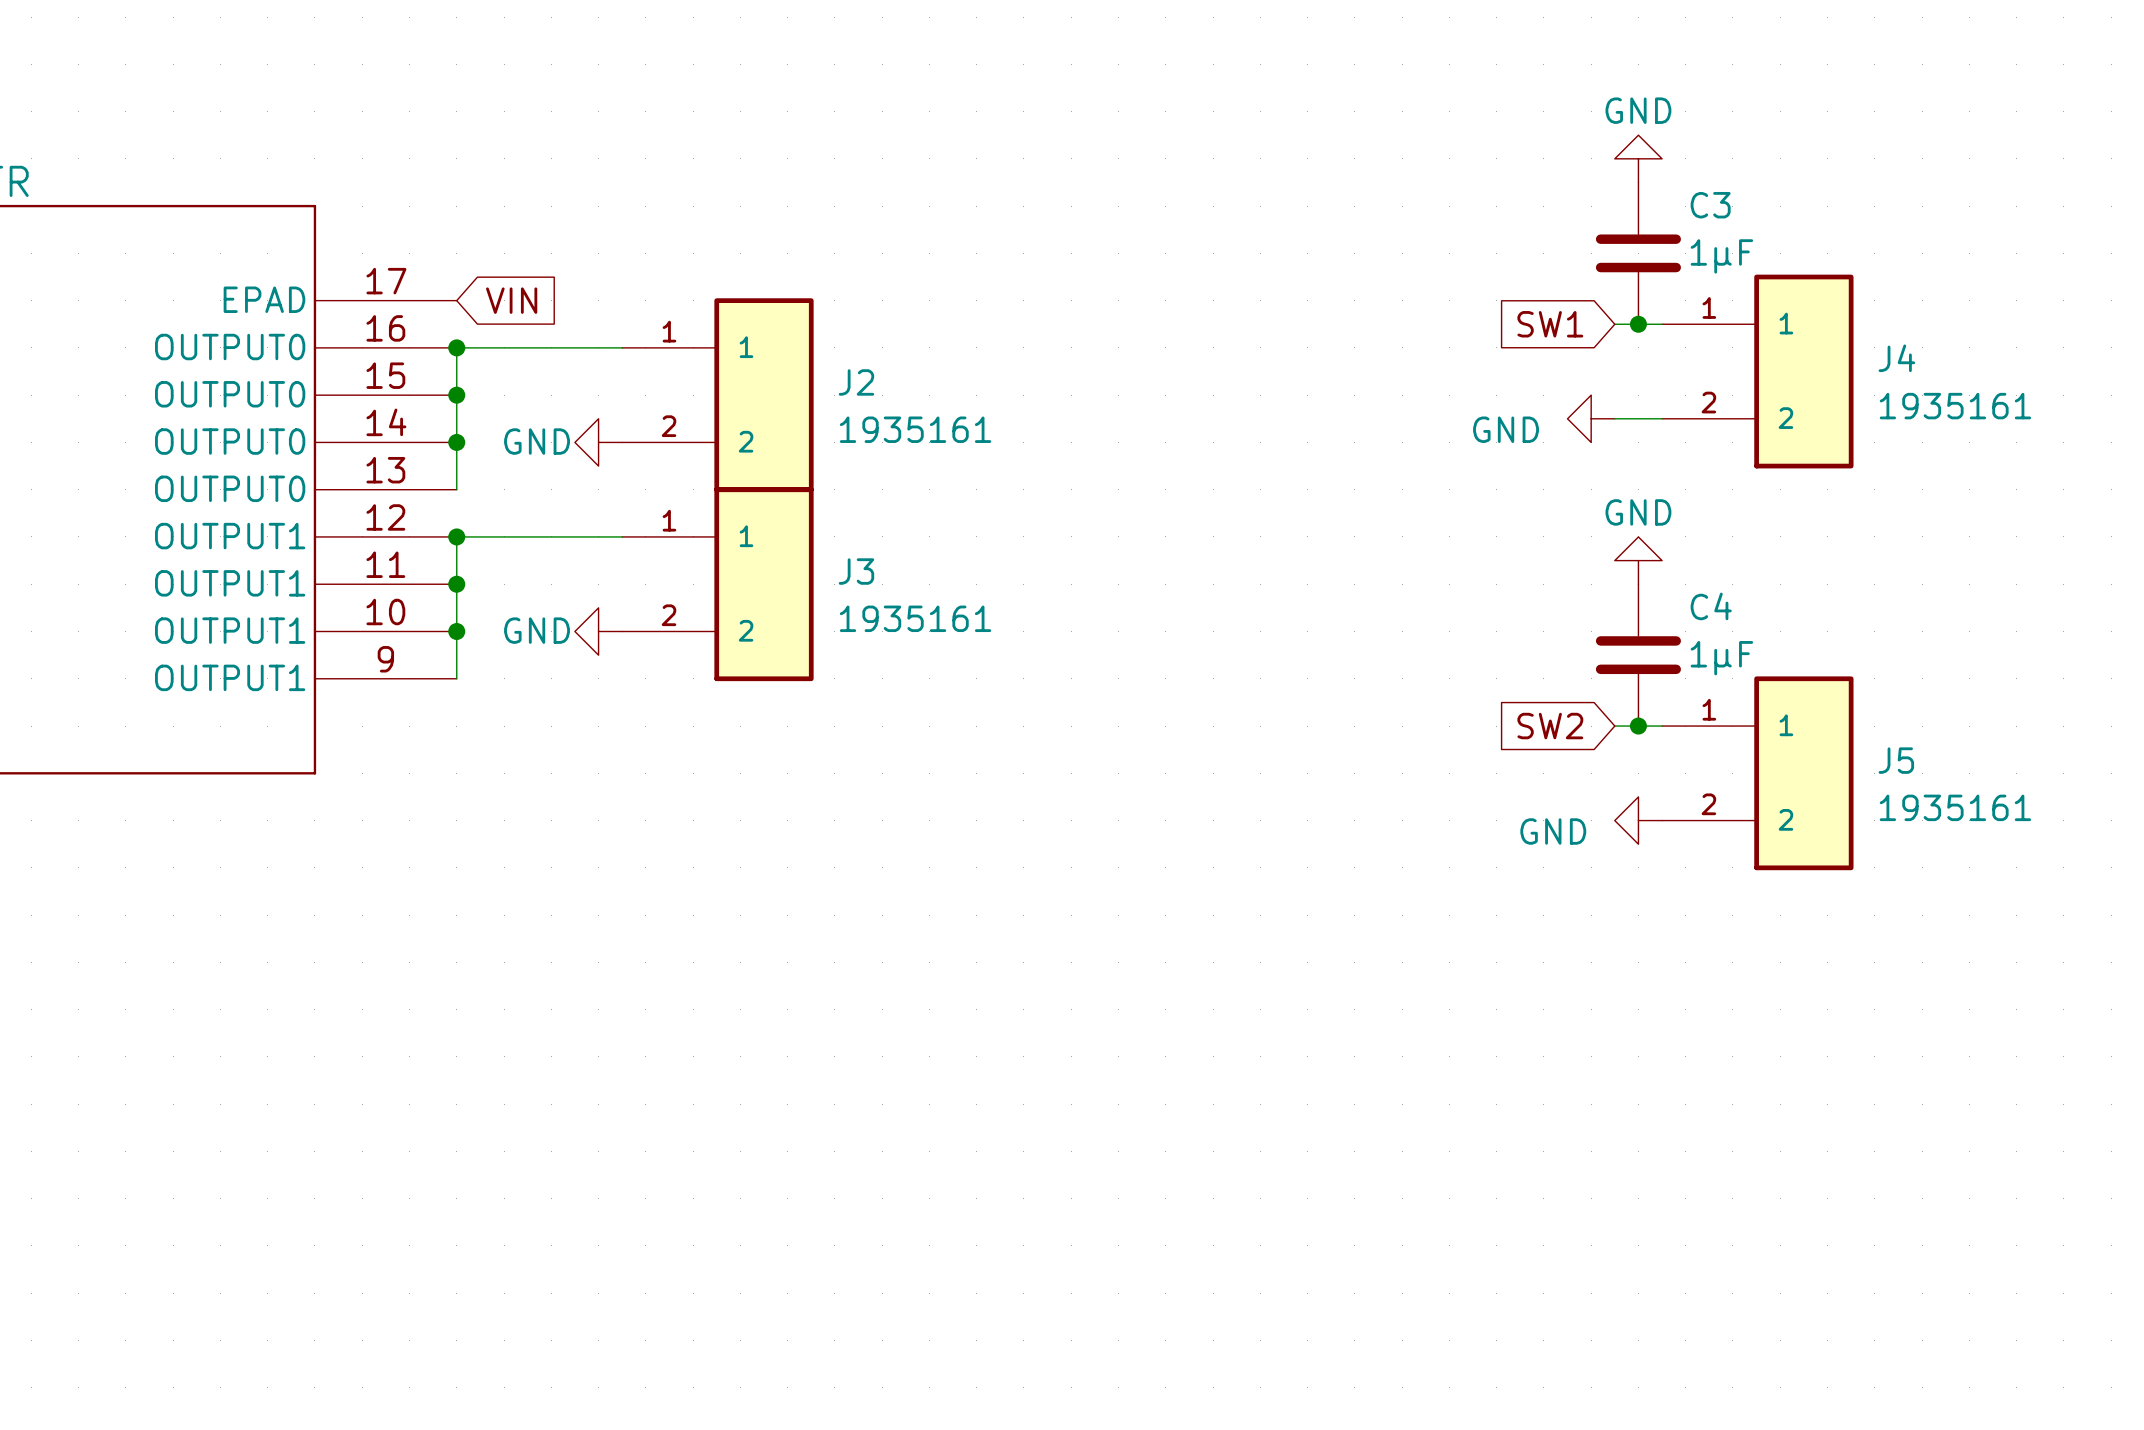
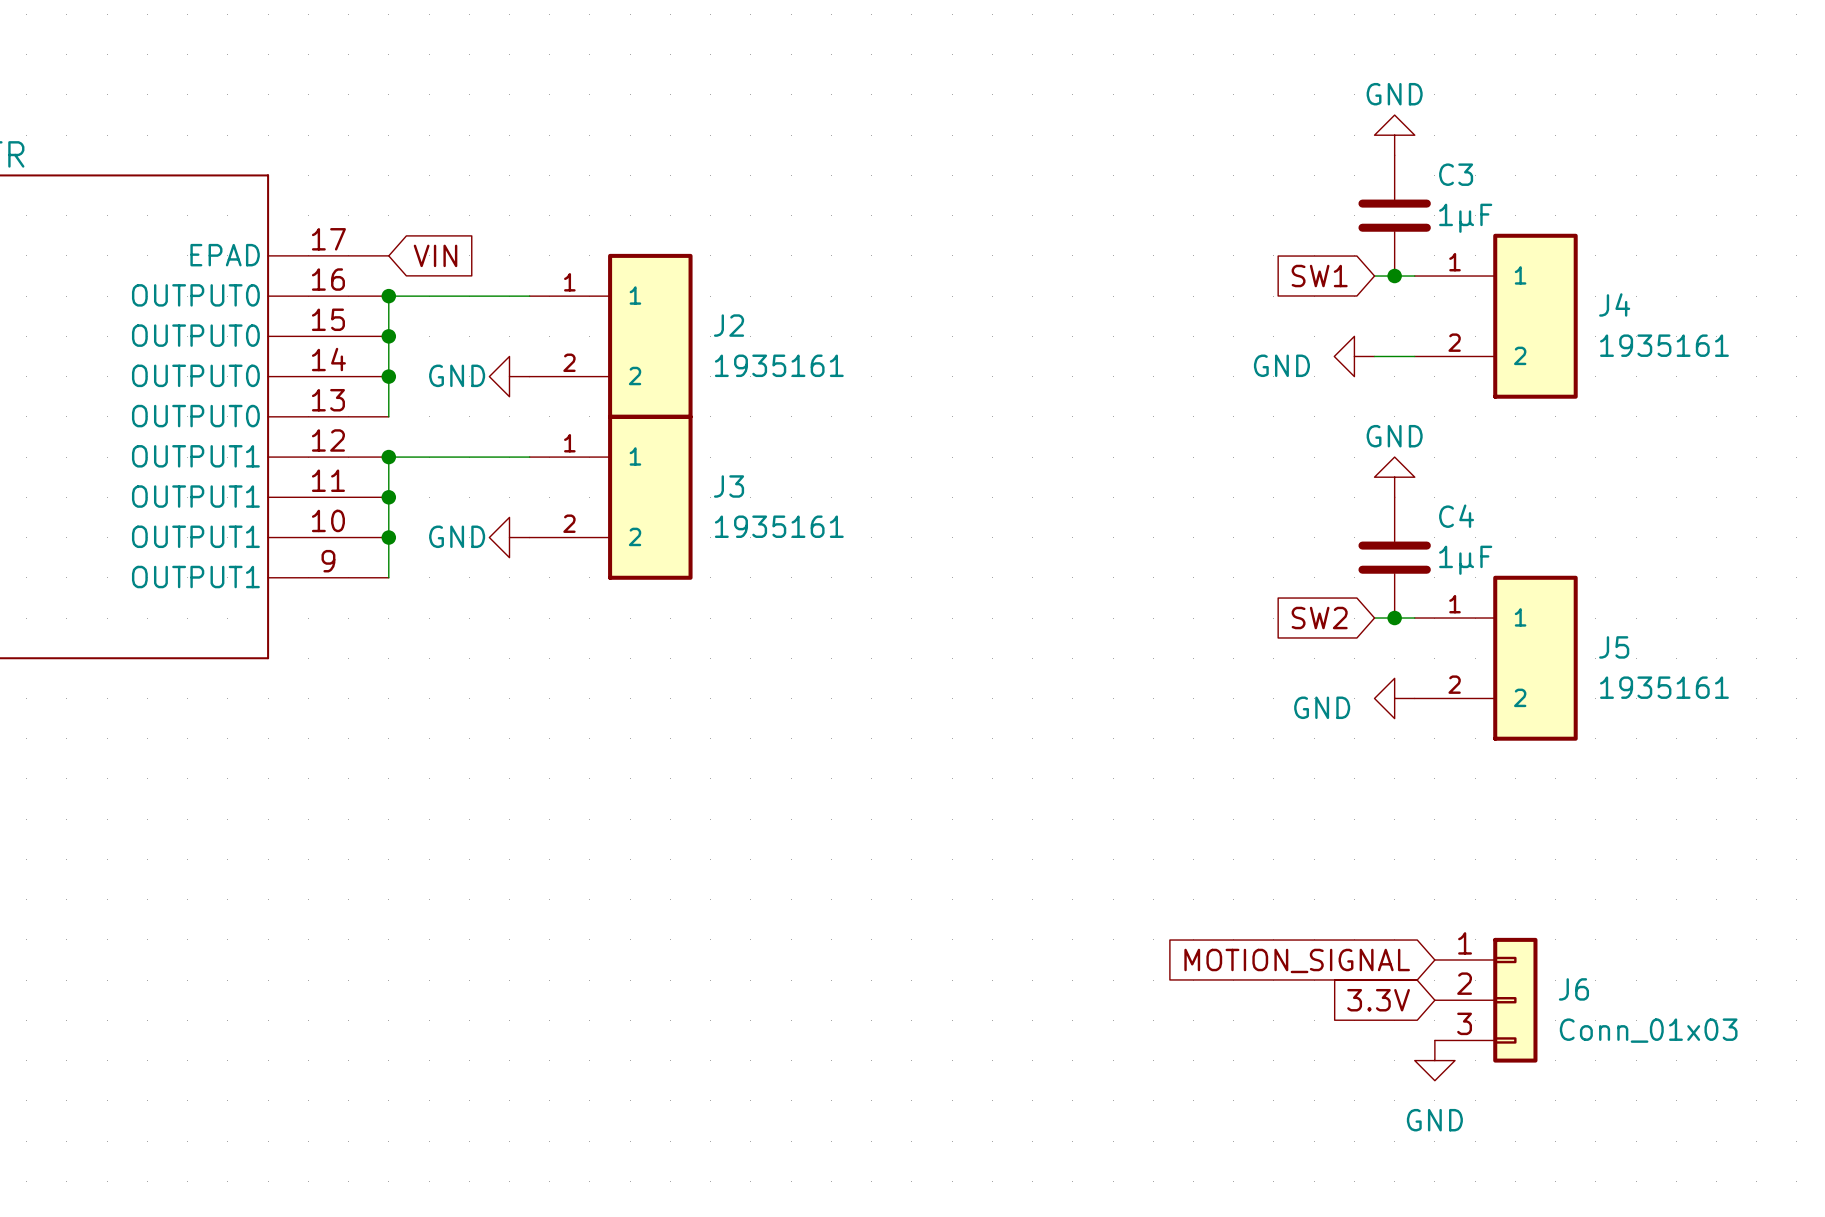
global label: none -> MOTION_SIGNAL (1297, 960)
global label: none -> 3.3V (1378, 1000)
J6: none -> Conn_01x03 (1486, 1000)
power symbol: none -> GND (1434, 1060)

